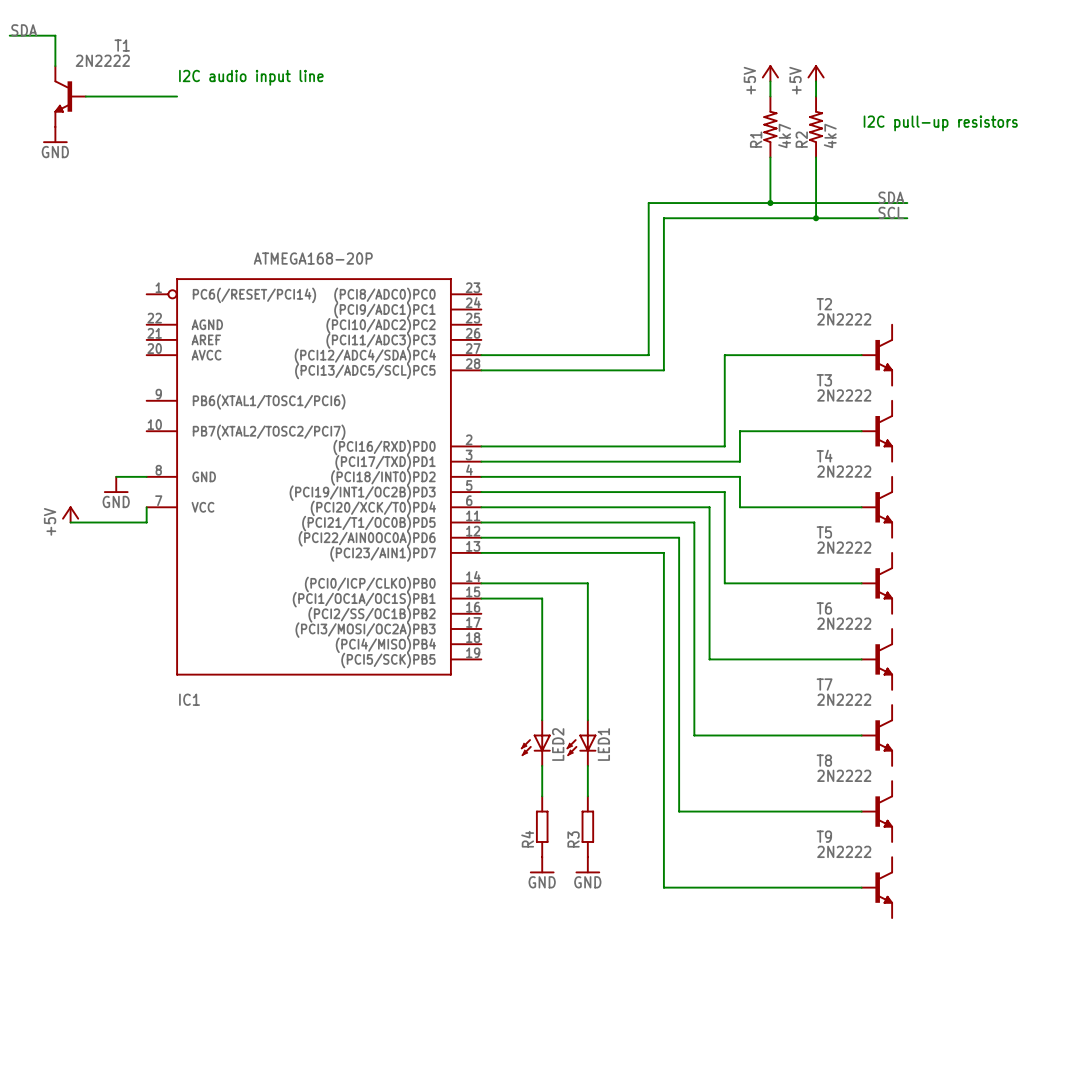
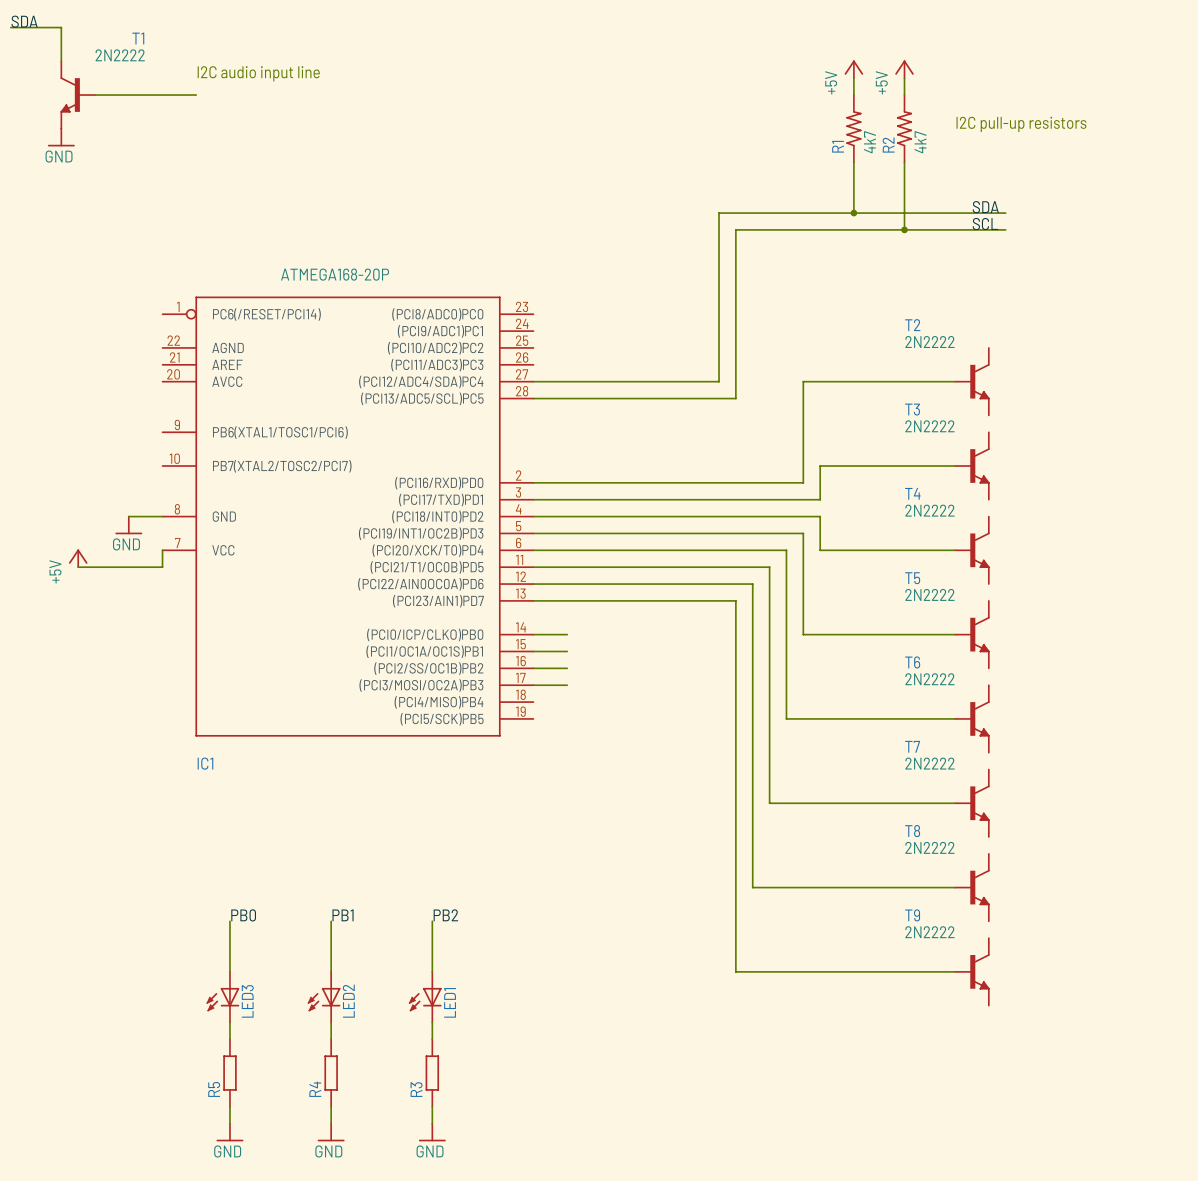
wire: (511, 583) (587, 583) (587, 720) -> none
wire: (511, 598) (542, 598) (542, 720) -> none
wire: none -> (533, 668) (567, 668)
wire: none -> (533, 685) (567, 685)
LED2 position: (535, 743) -> (324, 997)
LED1 position: (581, 743) -> (425, 997)
wire: (542, 765) (542, 796) -> none
wire: (587, 765) (587, 796) -> none
R4 position: (542, 826) -> (331, 1073)
R3 position: (587, 826) -> (432, 1073)
label: none -> PB0 (243, 915)
label: none -> PB1 (343, 915)
label: none -> PB2 (445, 915)
wire: none -> (229, 921) (229, 971)
wire: none -> (331, 921) (331, 971)
wire: none -> (432, 921) (432, 971)
power symbol: GND (542, 865) -> none
power symbol: GND (587, 865) -> none
LED3: none -> (222, 997)
wire: none -> (229, 1022) (229, 1039)
wire: none -> (331, 1022) (331, 1039)
wire: none -> (432, 1022) (432, 1039)
R5: none -> (229, 1073)
wire: none -> (229, 1106) (229, 1123)
wire: none -> (331, 1106) (331, 1123)
wire: none -> (432, 1106) (432, 1123)
power symbol: none -> GND (229, 1132)
power symbol: none -> GND (331, 1132)
power symbol: none -> GND (432, 1132)

